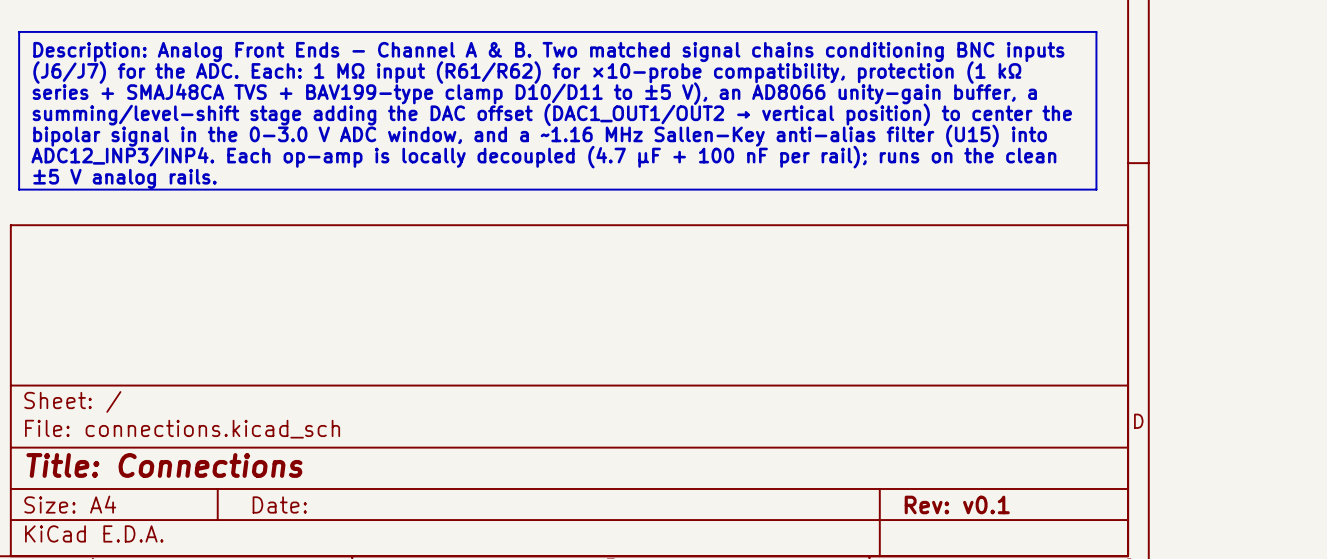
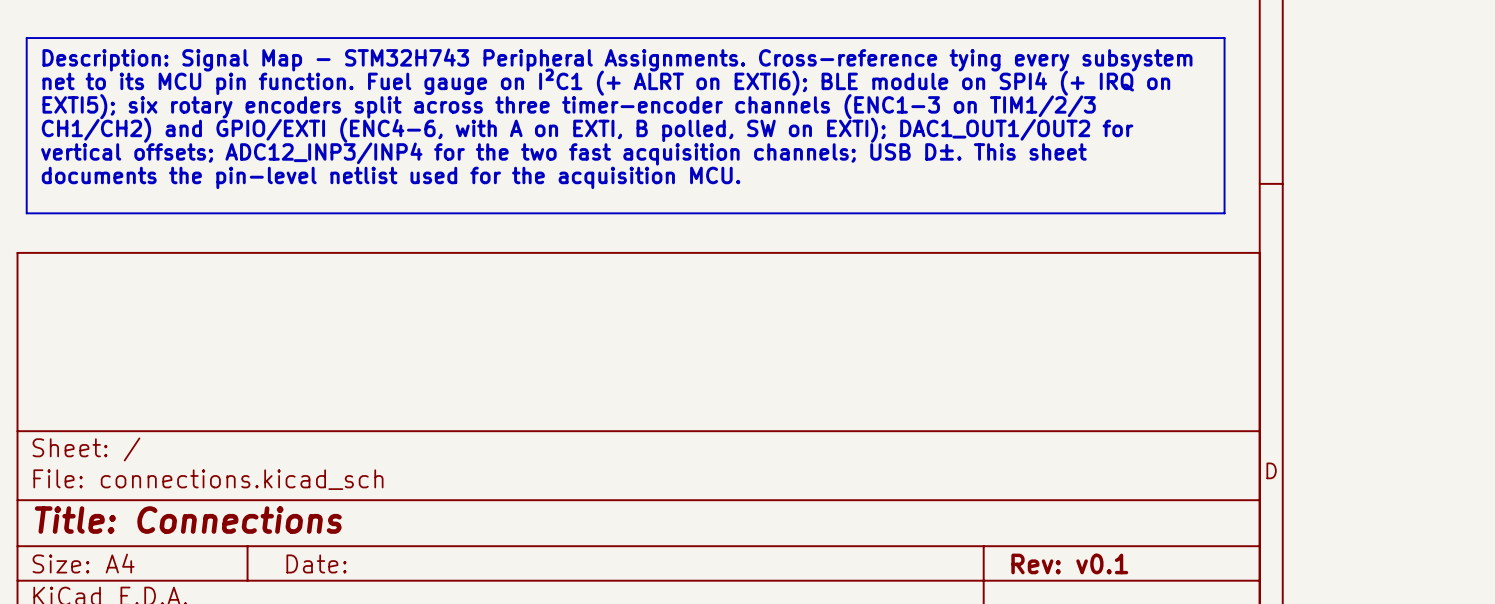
text: Description: Analog Front Ends - Channel A & B. Two matched signal chains conditioning BNC inputs (548, 51) -> Description: Signal Map - STM32H743 Peripheral Assignments. Cross-reference tying every subsystem (617, 59)
text: (J6/J7) for the ADC. Each: 1 MΩ input (R61/R62) for ×10-probe compatibility, protection (1 kΩ (527, 72) -> net to its MCU pin function. Fuel gauge on I²C1 (+ ALRT on EXTI6); BLE module on SPI4 (+ IRQ on (606, 82)
text: series + SMAJ48CA TVS + BAV199-type clamp D10/D11 to ±5 V), an AD8066 unity-gain buffer, a (534, 93) -> EXTI5); six rotary encoders split across three timer-encoder channels (ENC1-3 on TIM1/2/3 (569, 106)
text: summing/level-shift stage adding the DAC offset (DAC1_OUT1/OUT2 → vertical position) to center the (552, 114) -> CH1/CH2) and GPIO/EXTI (ENC4-6, with A on EXTI, B polled, SW on EXTI); DAC1_OUT1/OUT2 for (587, 130)
text: bipolar signal in the 0-3.0 V ADC window, and a ~1.16 MHz Sallen-Key anti-alias filter (U15) into (540, 135) -> vertical offsets; ADC12_INP3/INP4 for the two fast acquisition channels; USB D±. This sheet (563, 154)
text: ADC12_INP3/INP4. Each op-amp is locally decoupled (4.7 µF + 100 nF per rail); runs on the clean (543, 157) -> documents the pin-level netlist used for the acquisition MCU. (391, 177)
text: ±5 V analog rails. (125, 178) -> none

